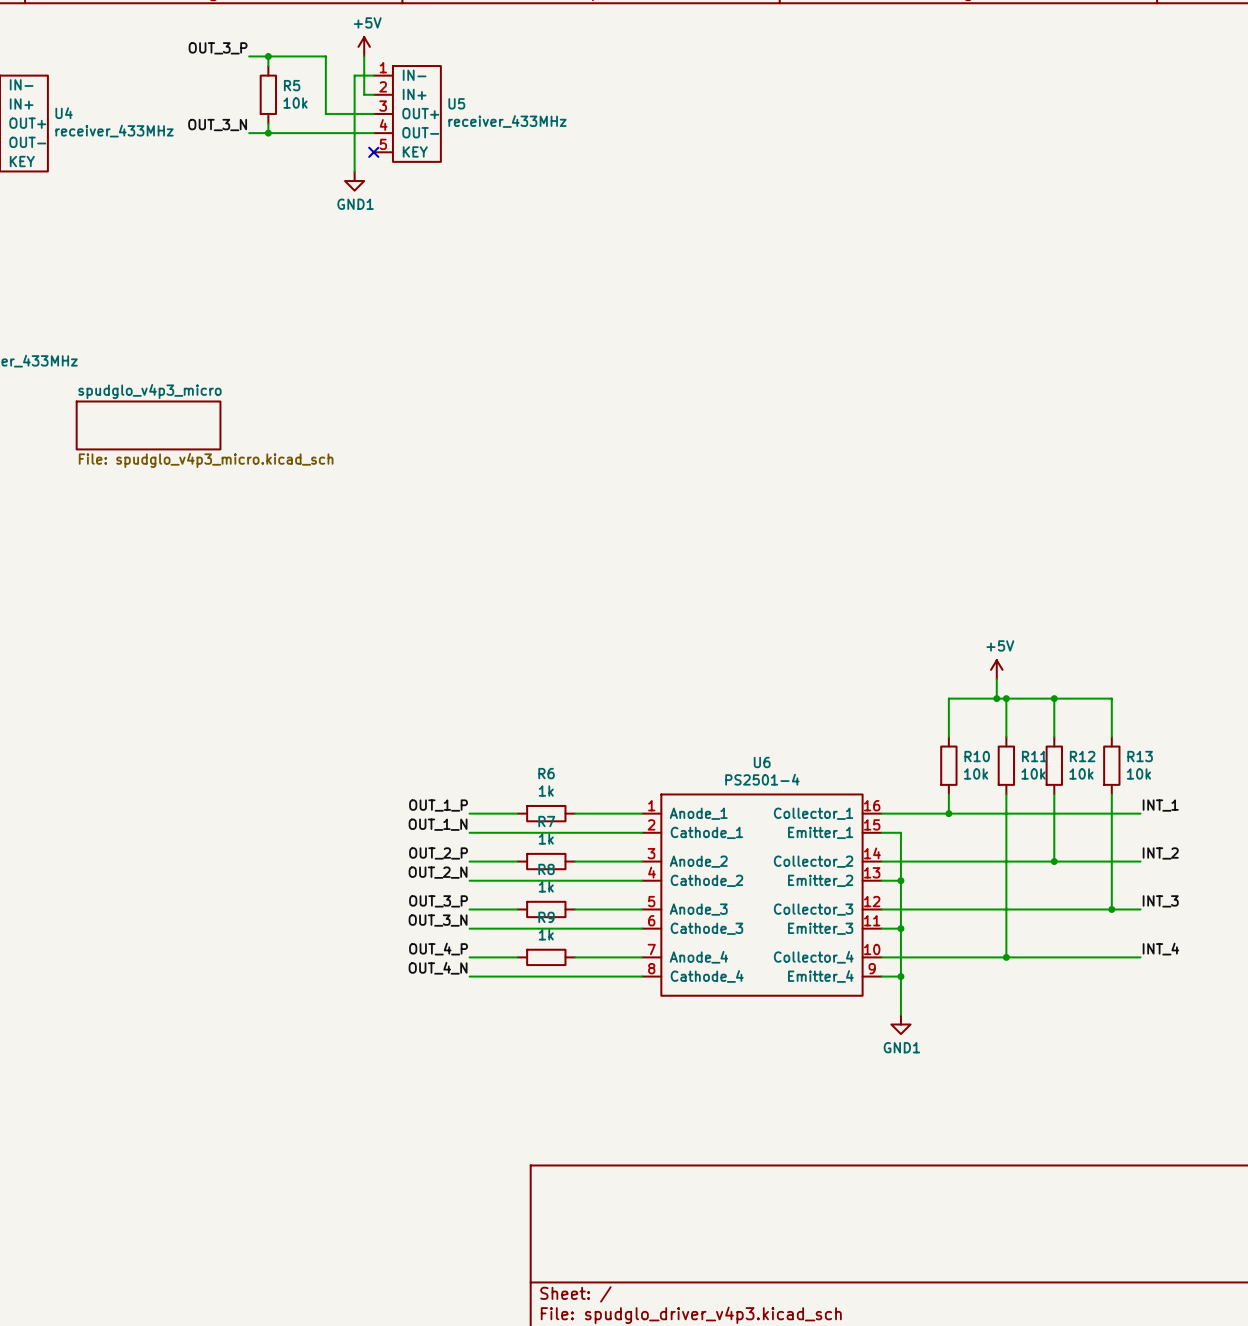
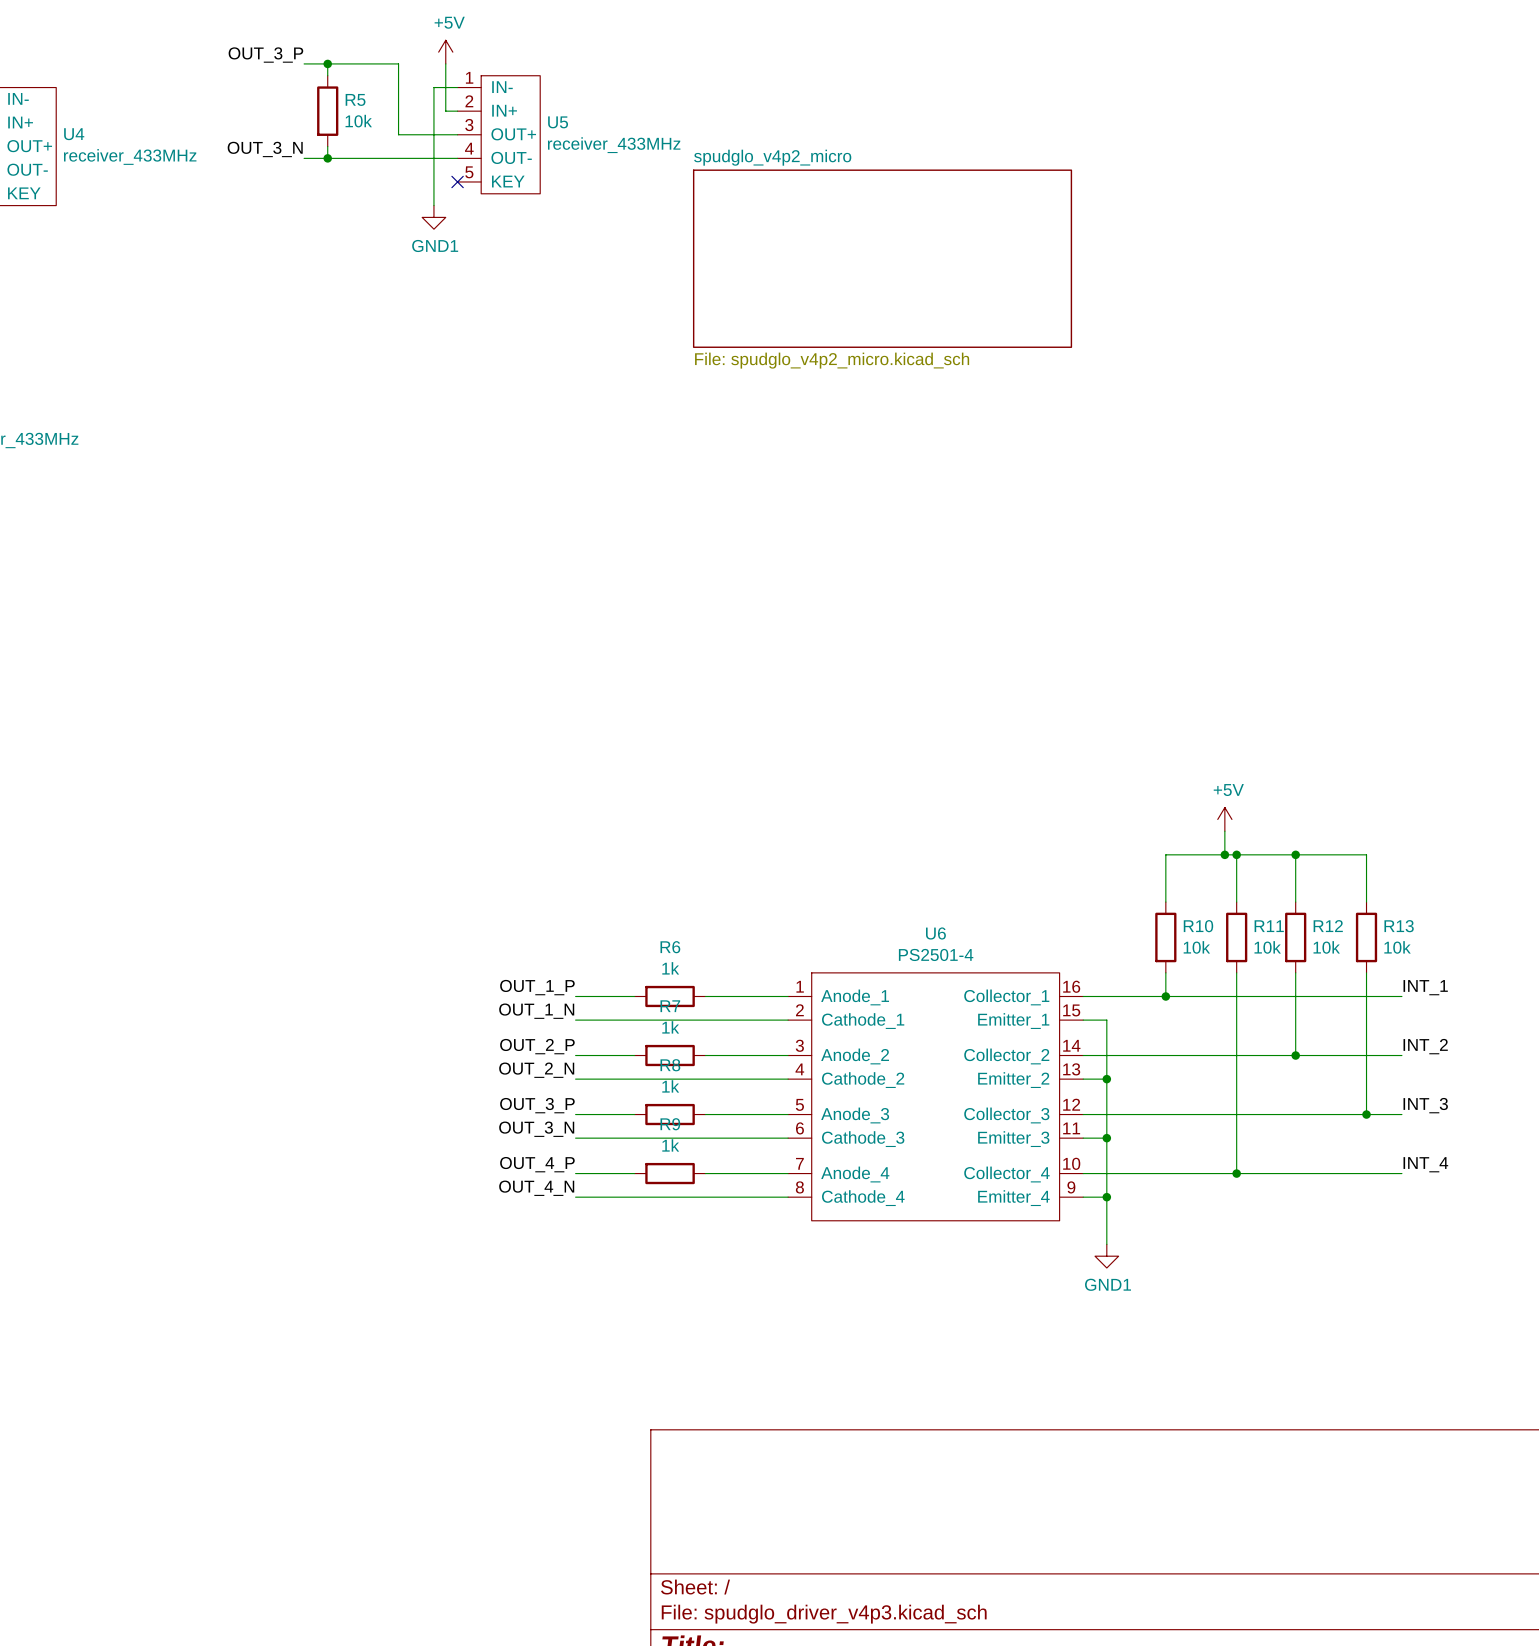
sheet spudglo_v4p2_micro: none -> File: spudglo_v4p2_micro.kicad_sch (882, 258)
sheet spudglo_v4p3_micro: File: spudglo_v4p3_micro.kicad_sch (148, 425) -> none

